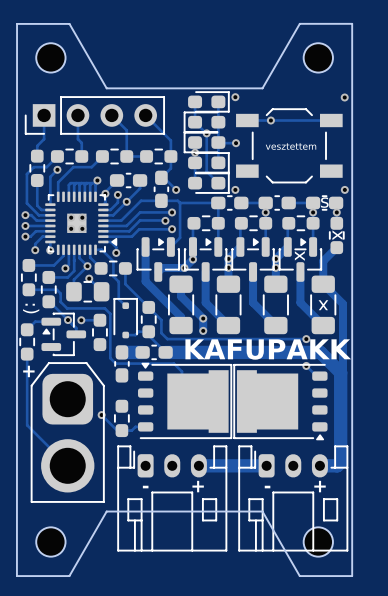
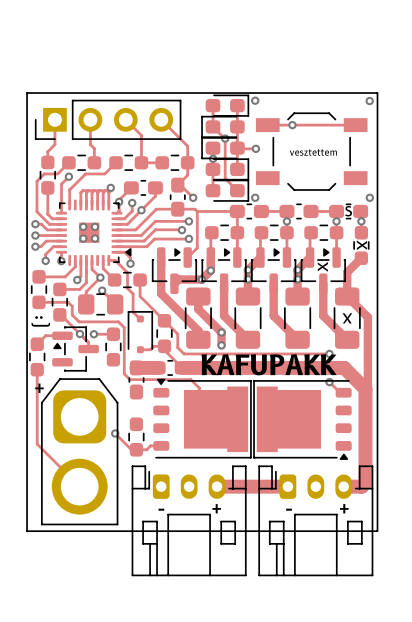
part: (50, 57) -> none
part: (318, 57) -> none
board edge: (352, 89) (352, 23) (299, 23) (262, 88) (106, 88) (69, 23) (17, 23) (16, 576) (69, 576) (106, 511) (262, 511) (299, 576) (352, 576) (352, 508) -> (377, 93) (27, 93) (27, 531) (377, 531)
part: (50, 541) -> none
part: (318, 541) -> none

